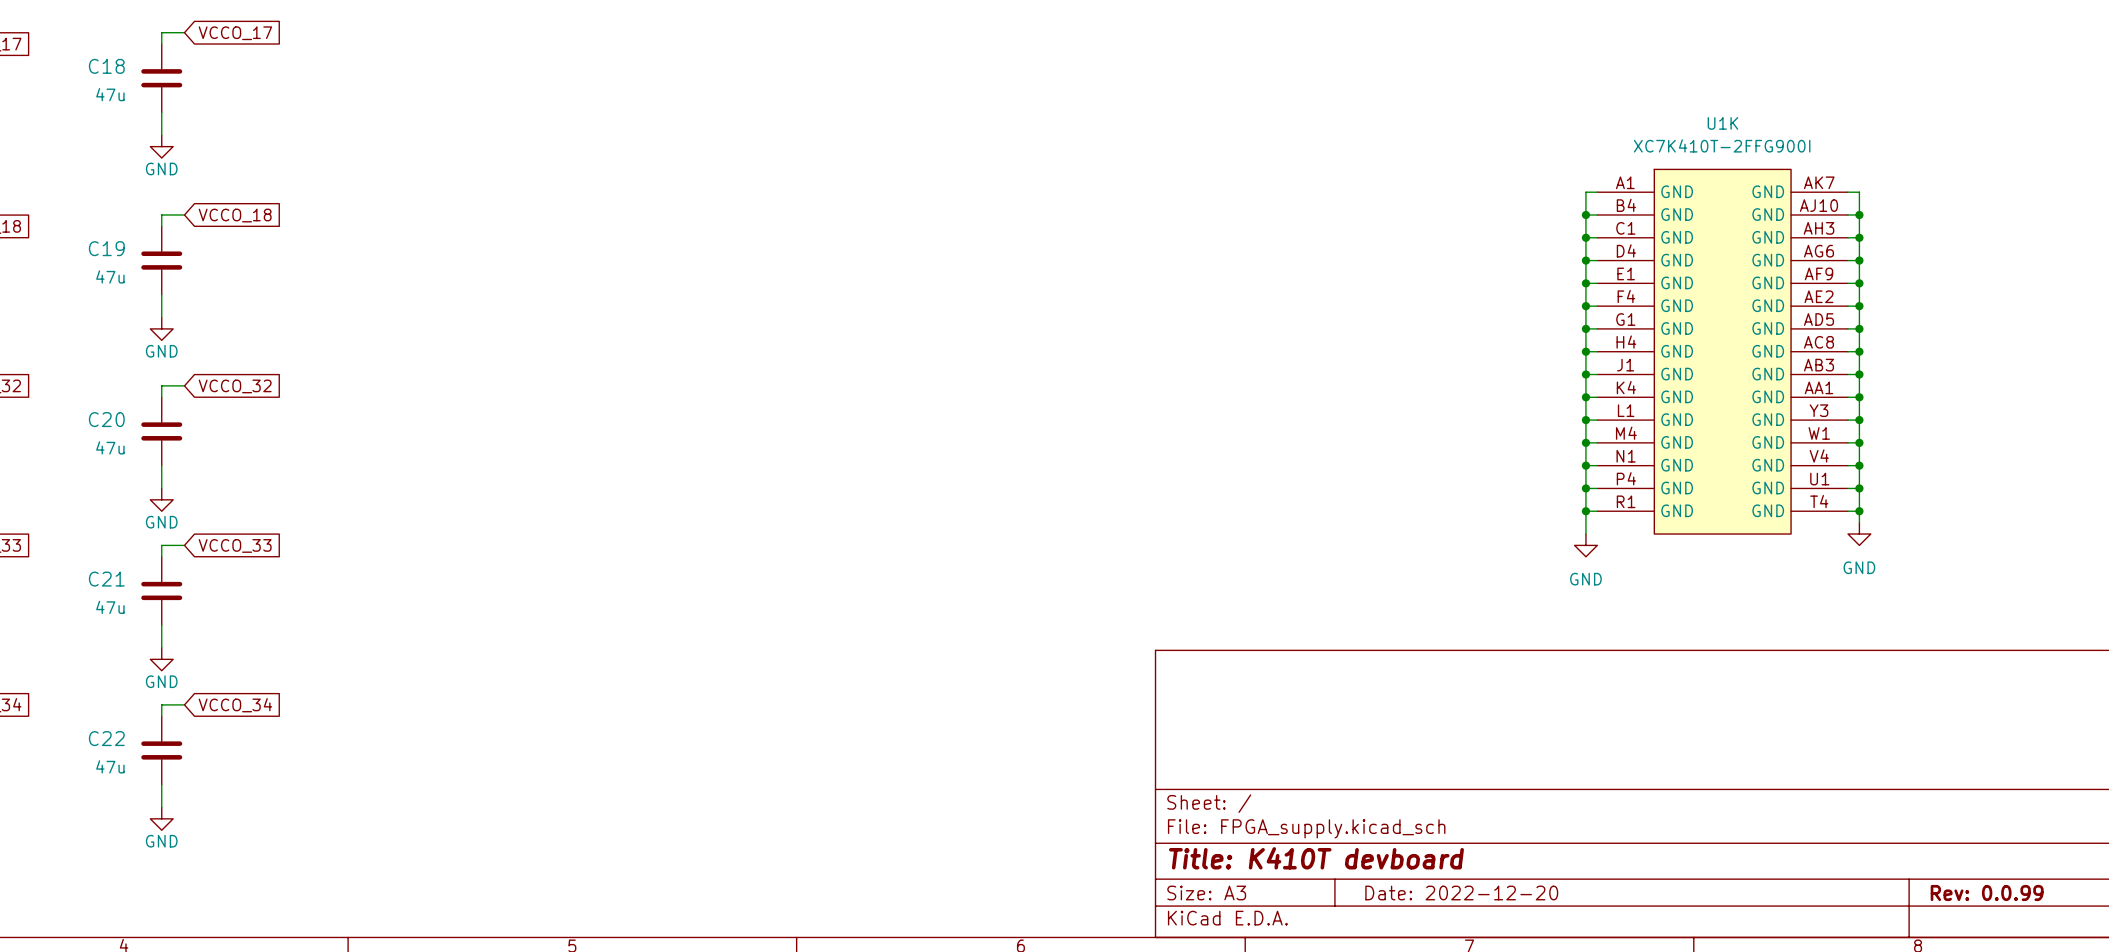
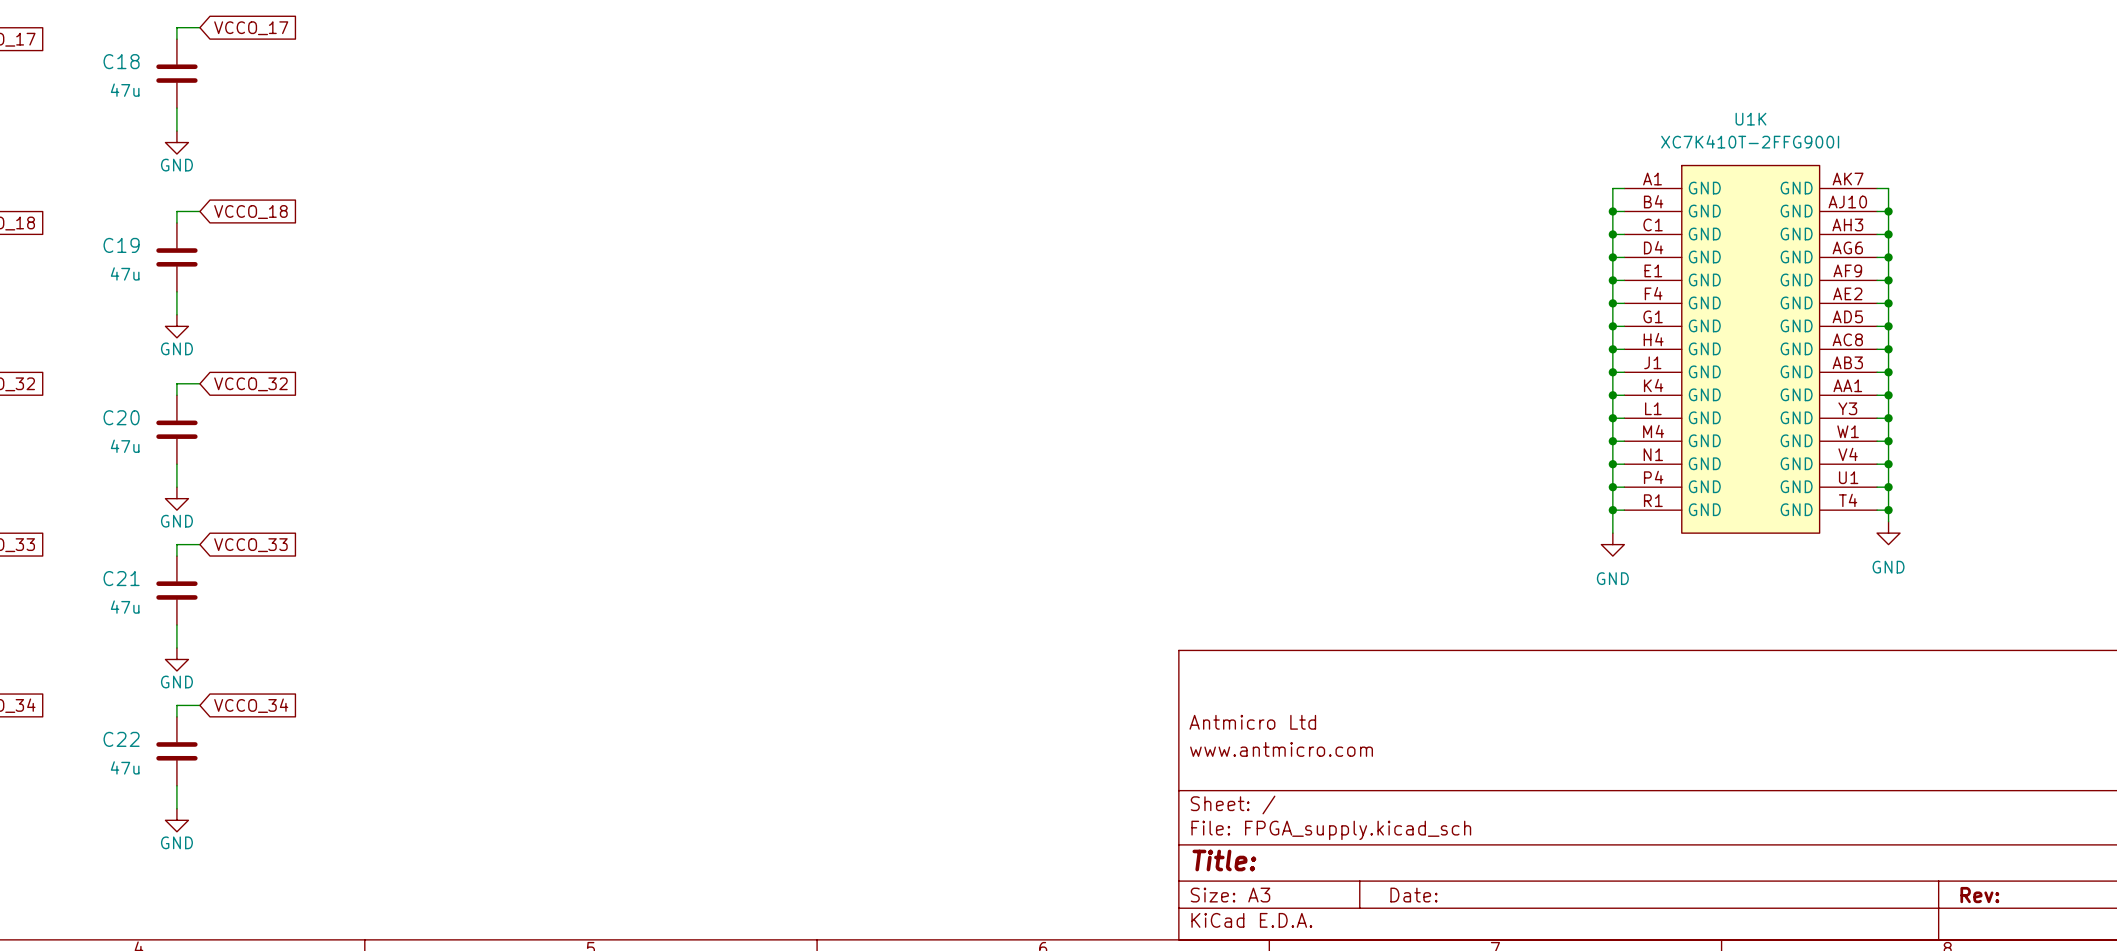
title block: none -> Antmicro Ltd (1252, 722)
title block: none -> www.antmicro.com (1281, 749)
title block: Title: K410T devboard (1316, 858) -> Title: (1224, 860)
title block: Date: 2022-12-20 (1461, 893) -> Date: (1413, 895)
title block: Rev: 0.0.99 (1987, 893) -> Rev: (1979, 895)

